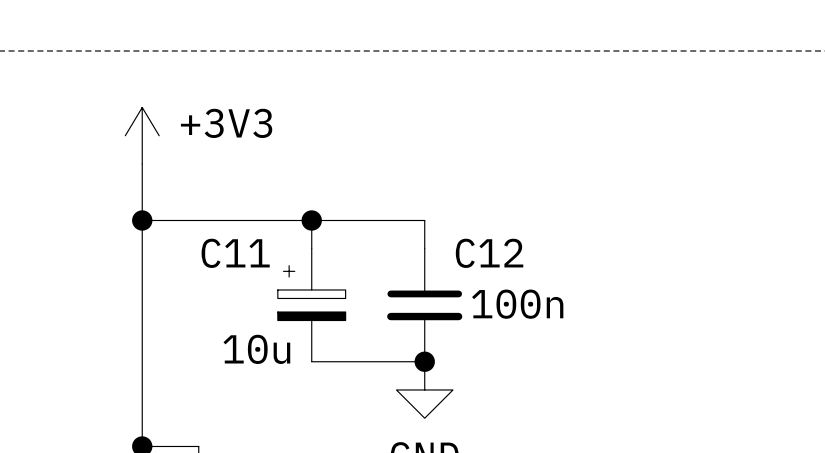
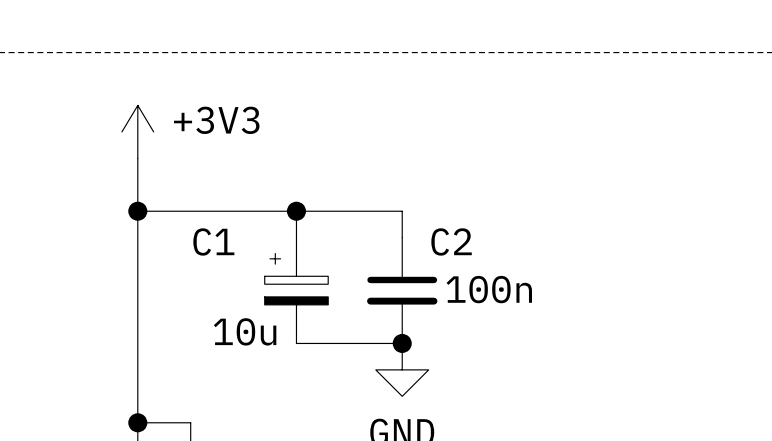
C11 name: C11 (235, 253) -> C1 (213, 241)
C12 name: C12 (489, 253) -> C2 (451, 241)

